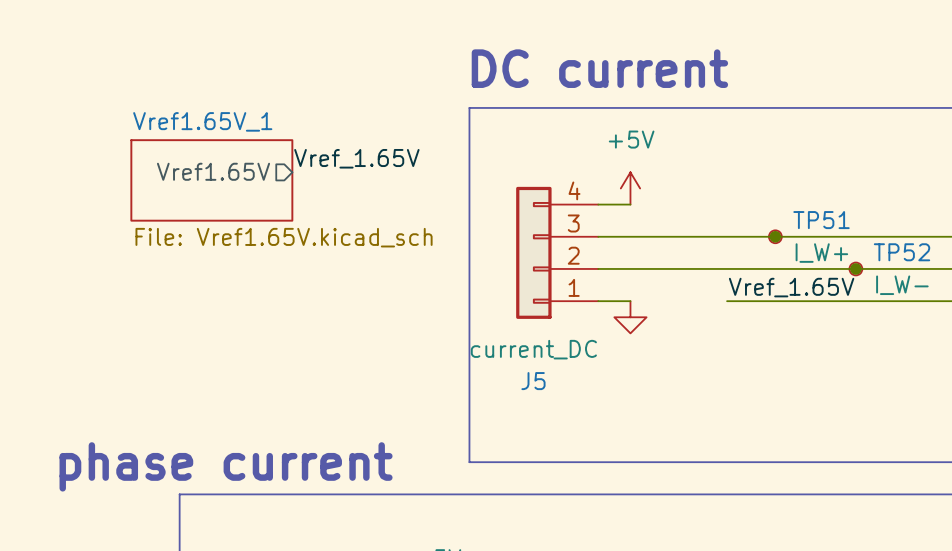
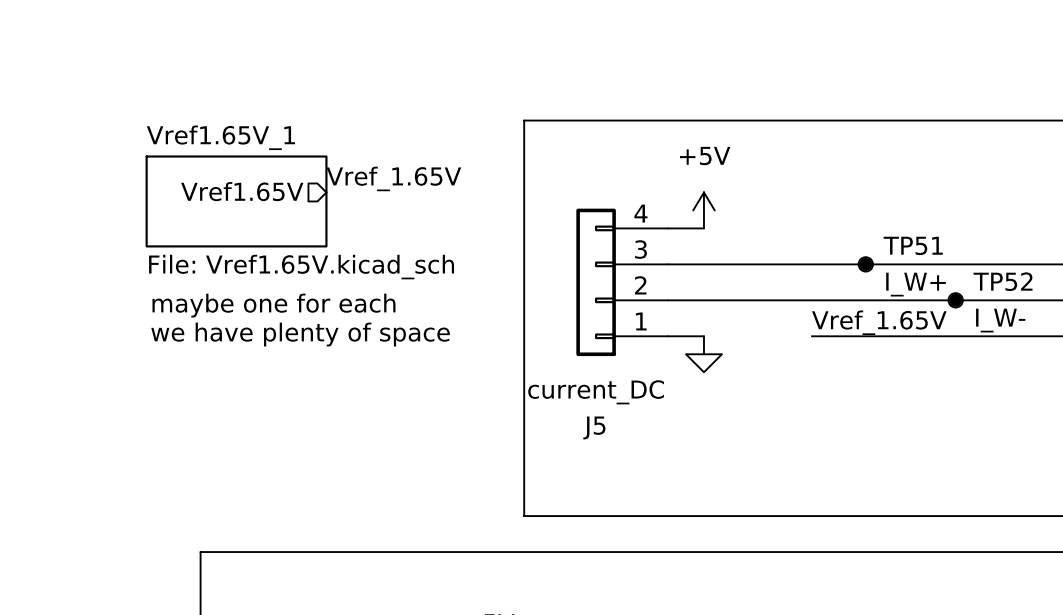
text: DC current (599, 68) -> none
text: none -> maybe one for each (273, 305)
text: none -> we have plenty of space (300, 334)
text: phase current (226, 466) -> none

